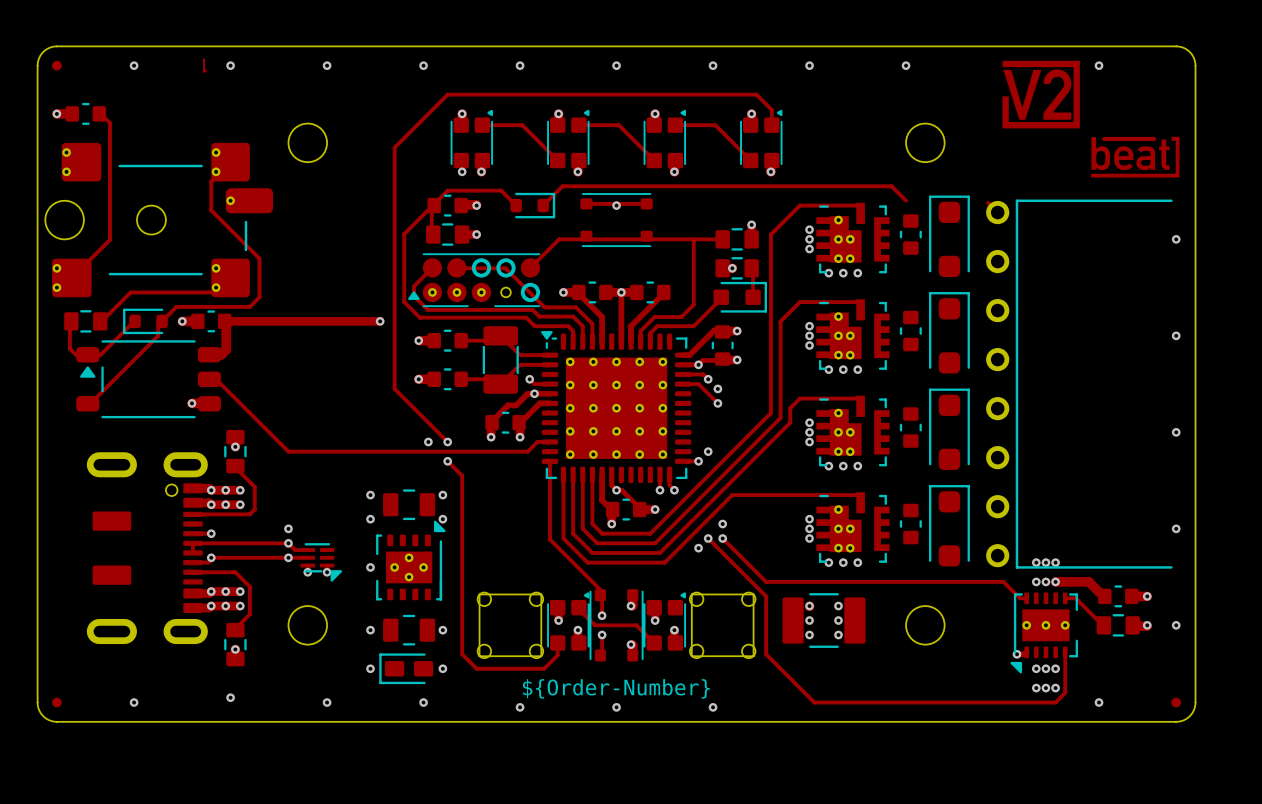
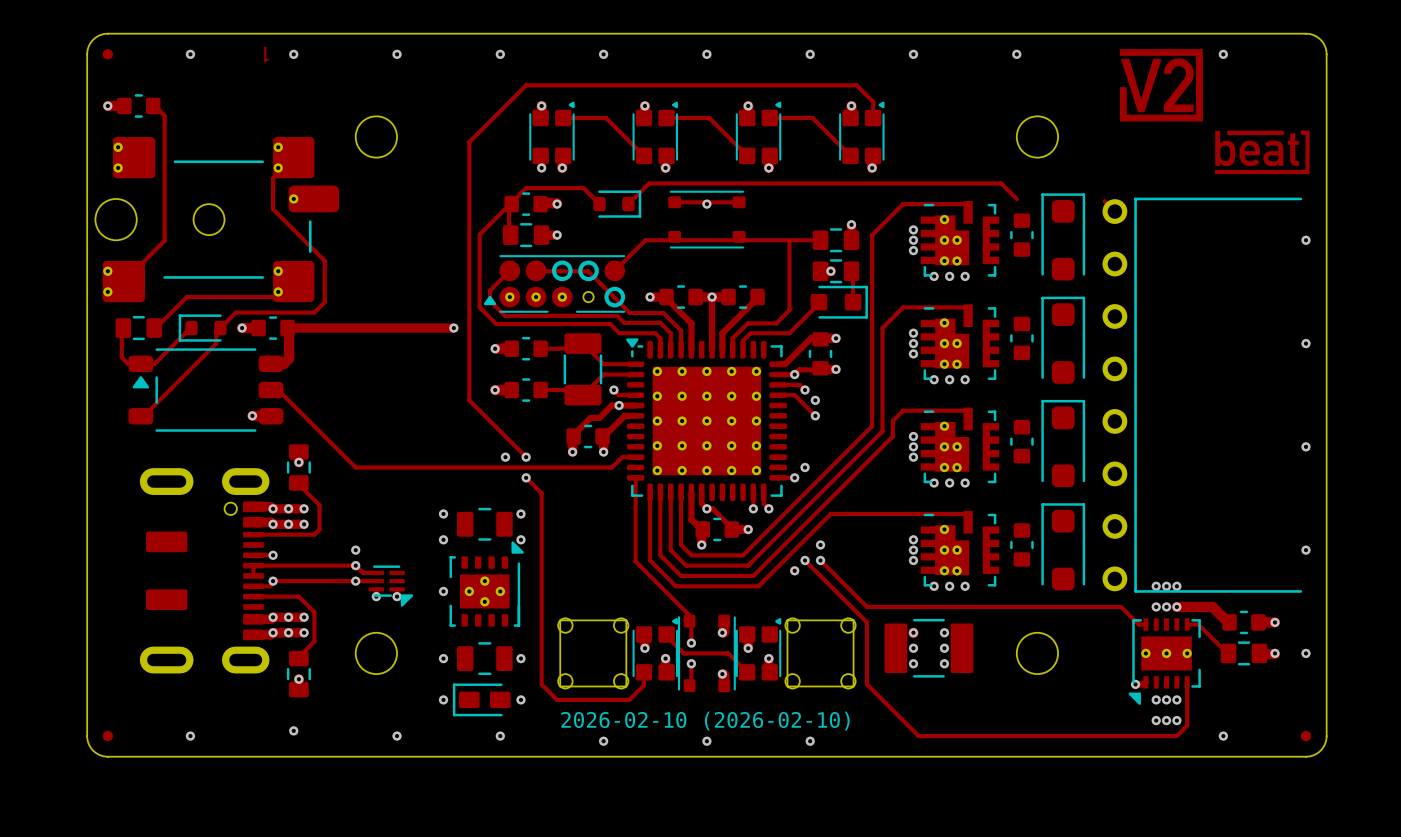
drawing shape: [522, 679, 710, 699] -> [561, 711, 850, 731]

